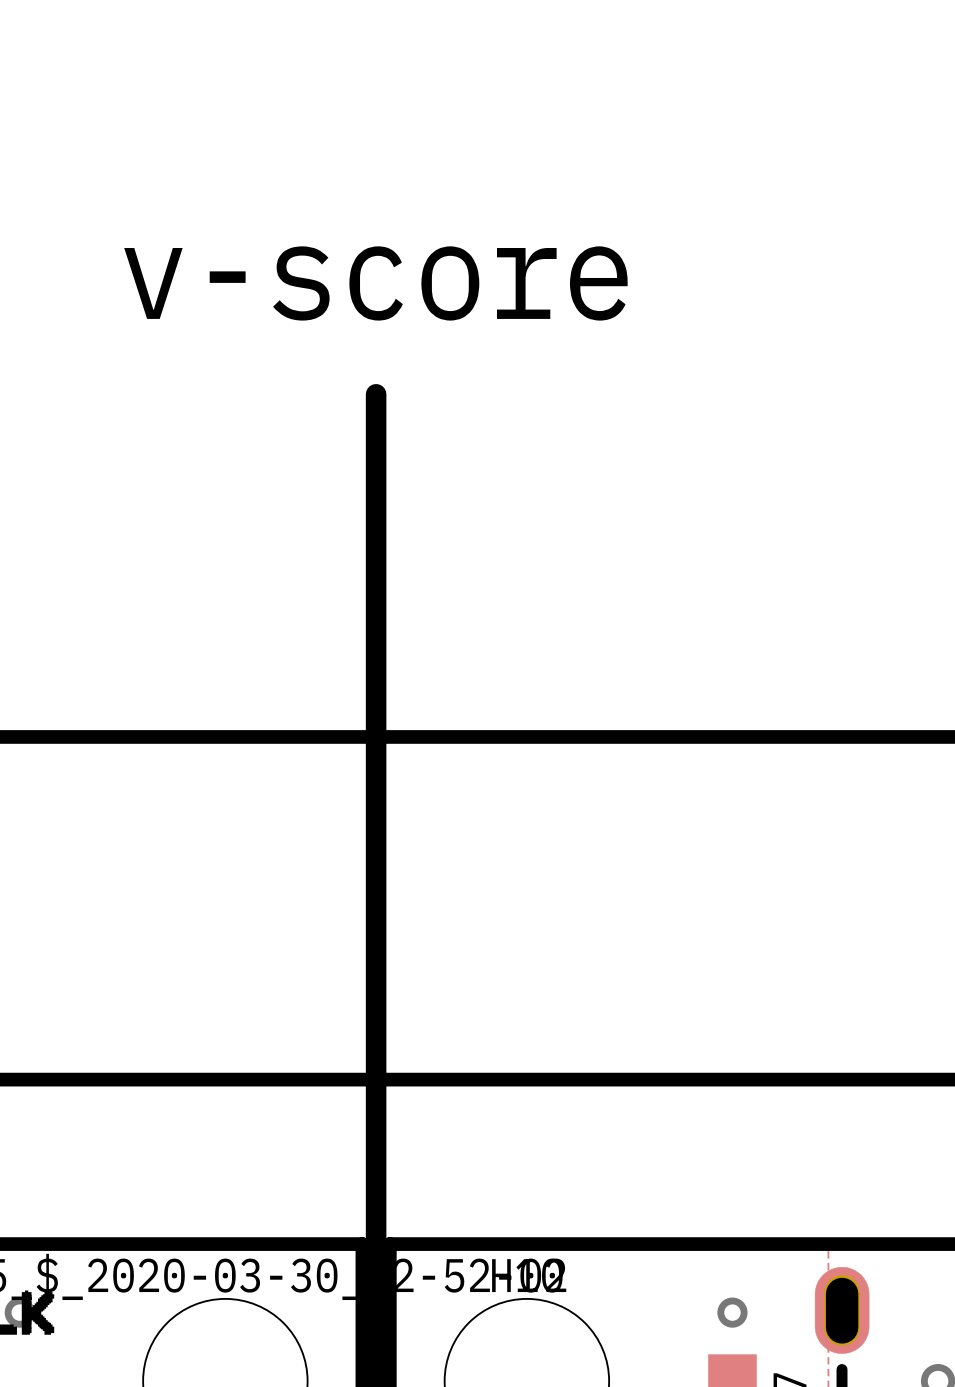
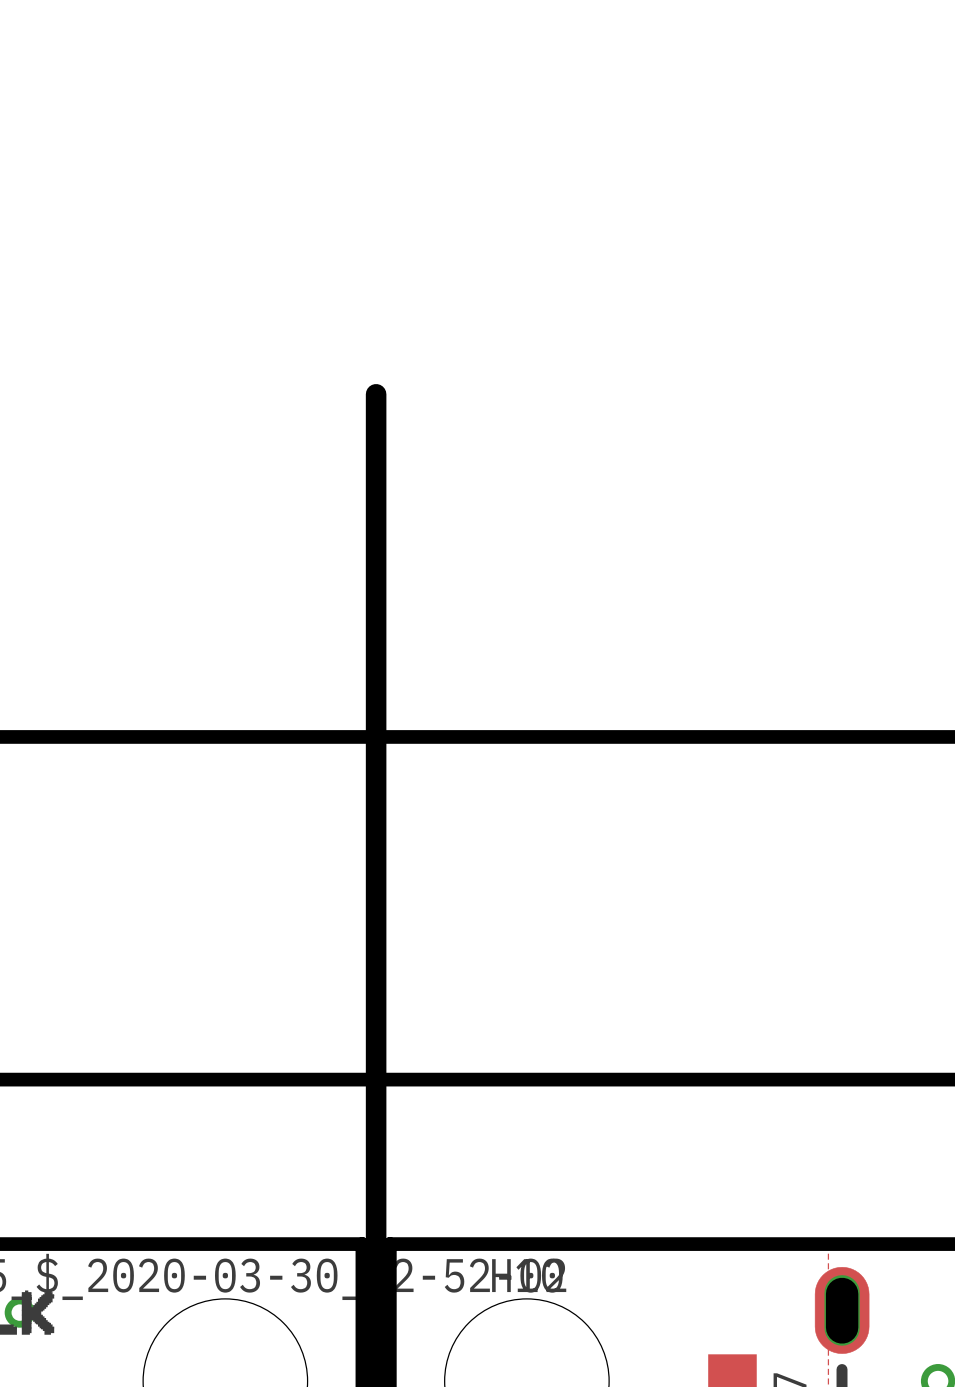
text: v-score (375, 283) -> none
via: (732, 1312) -> none

